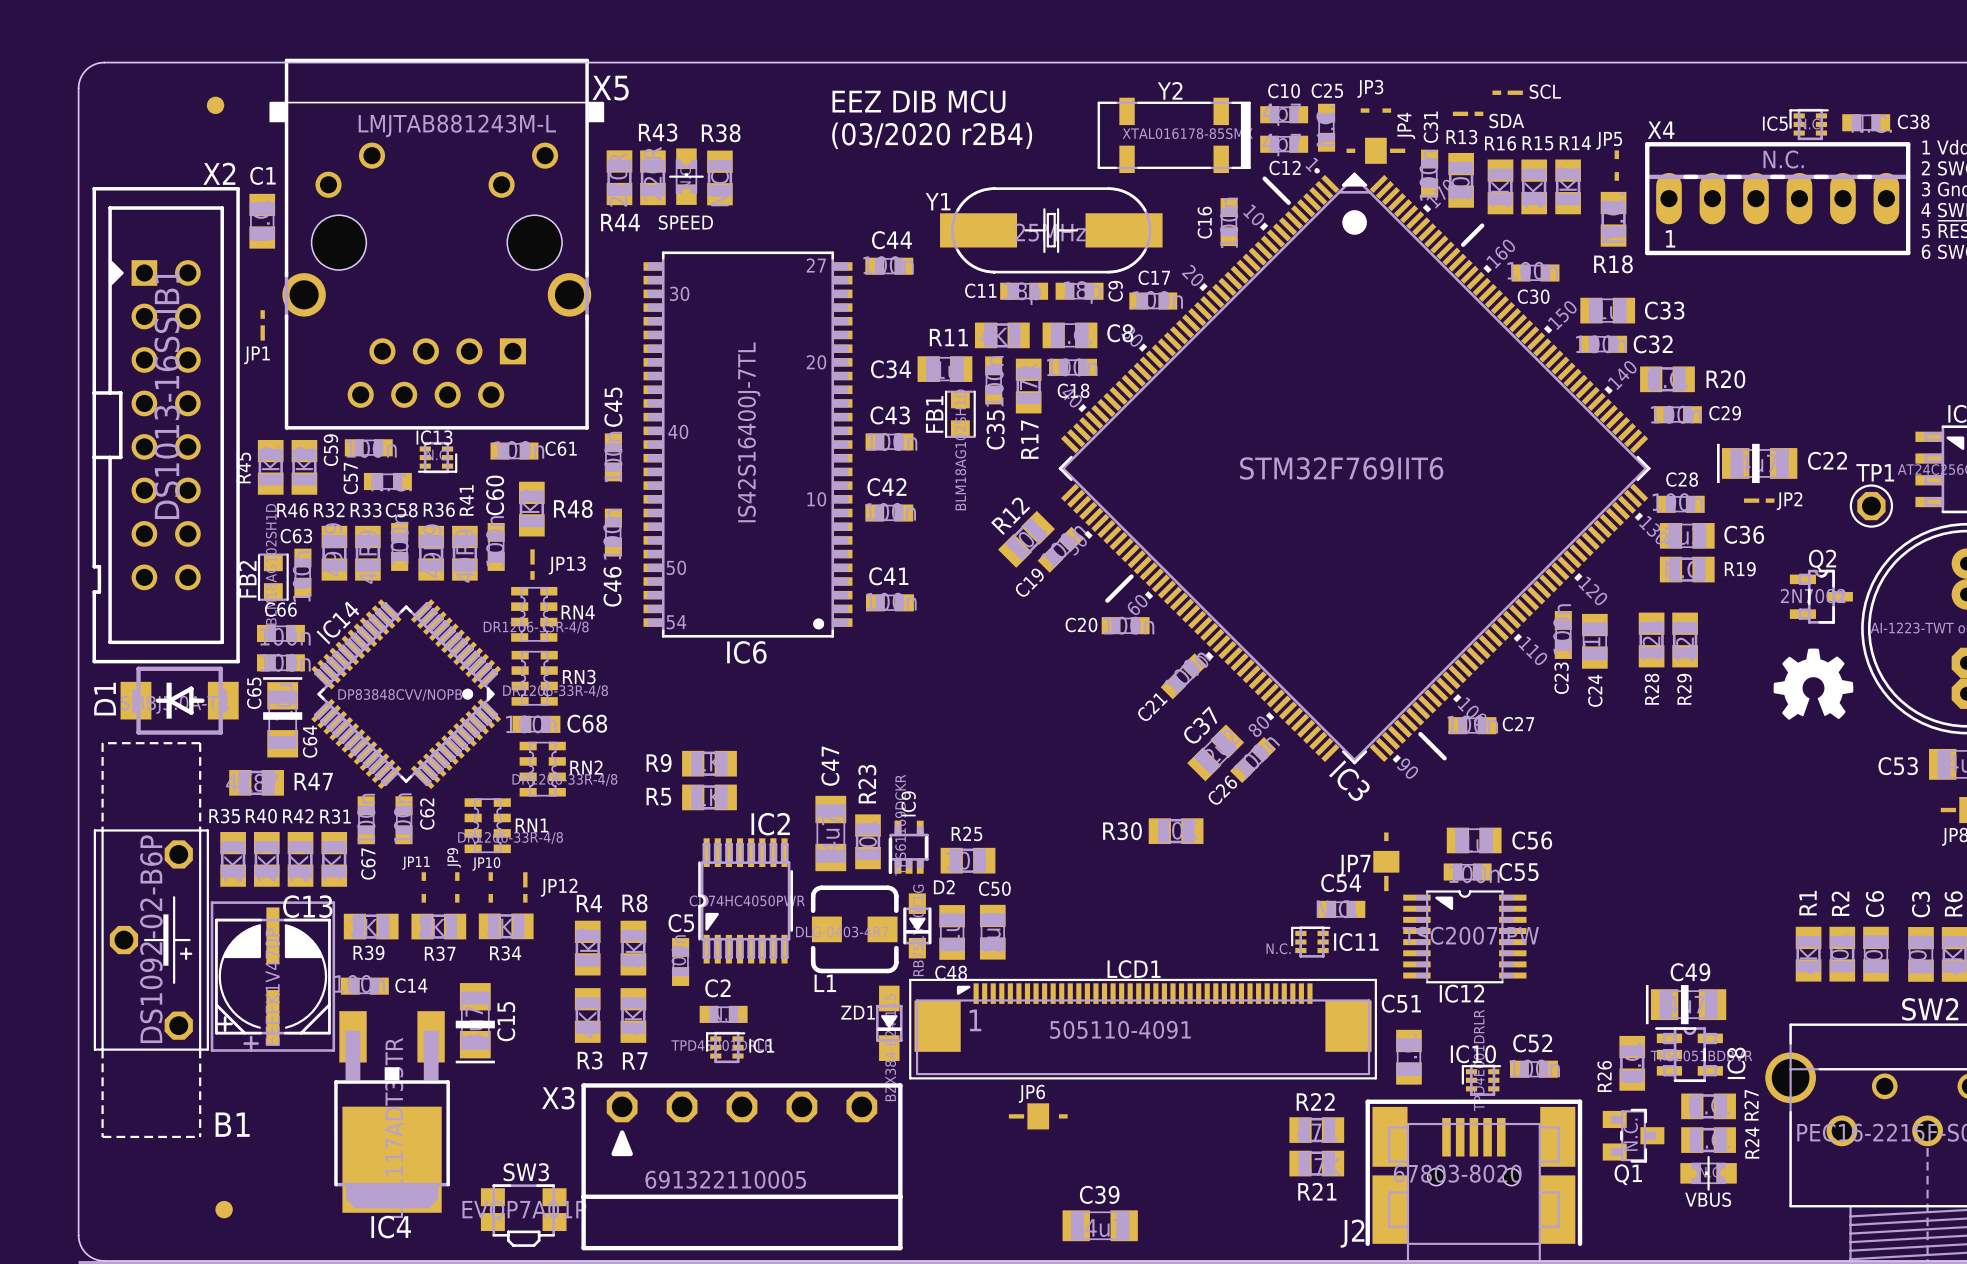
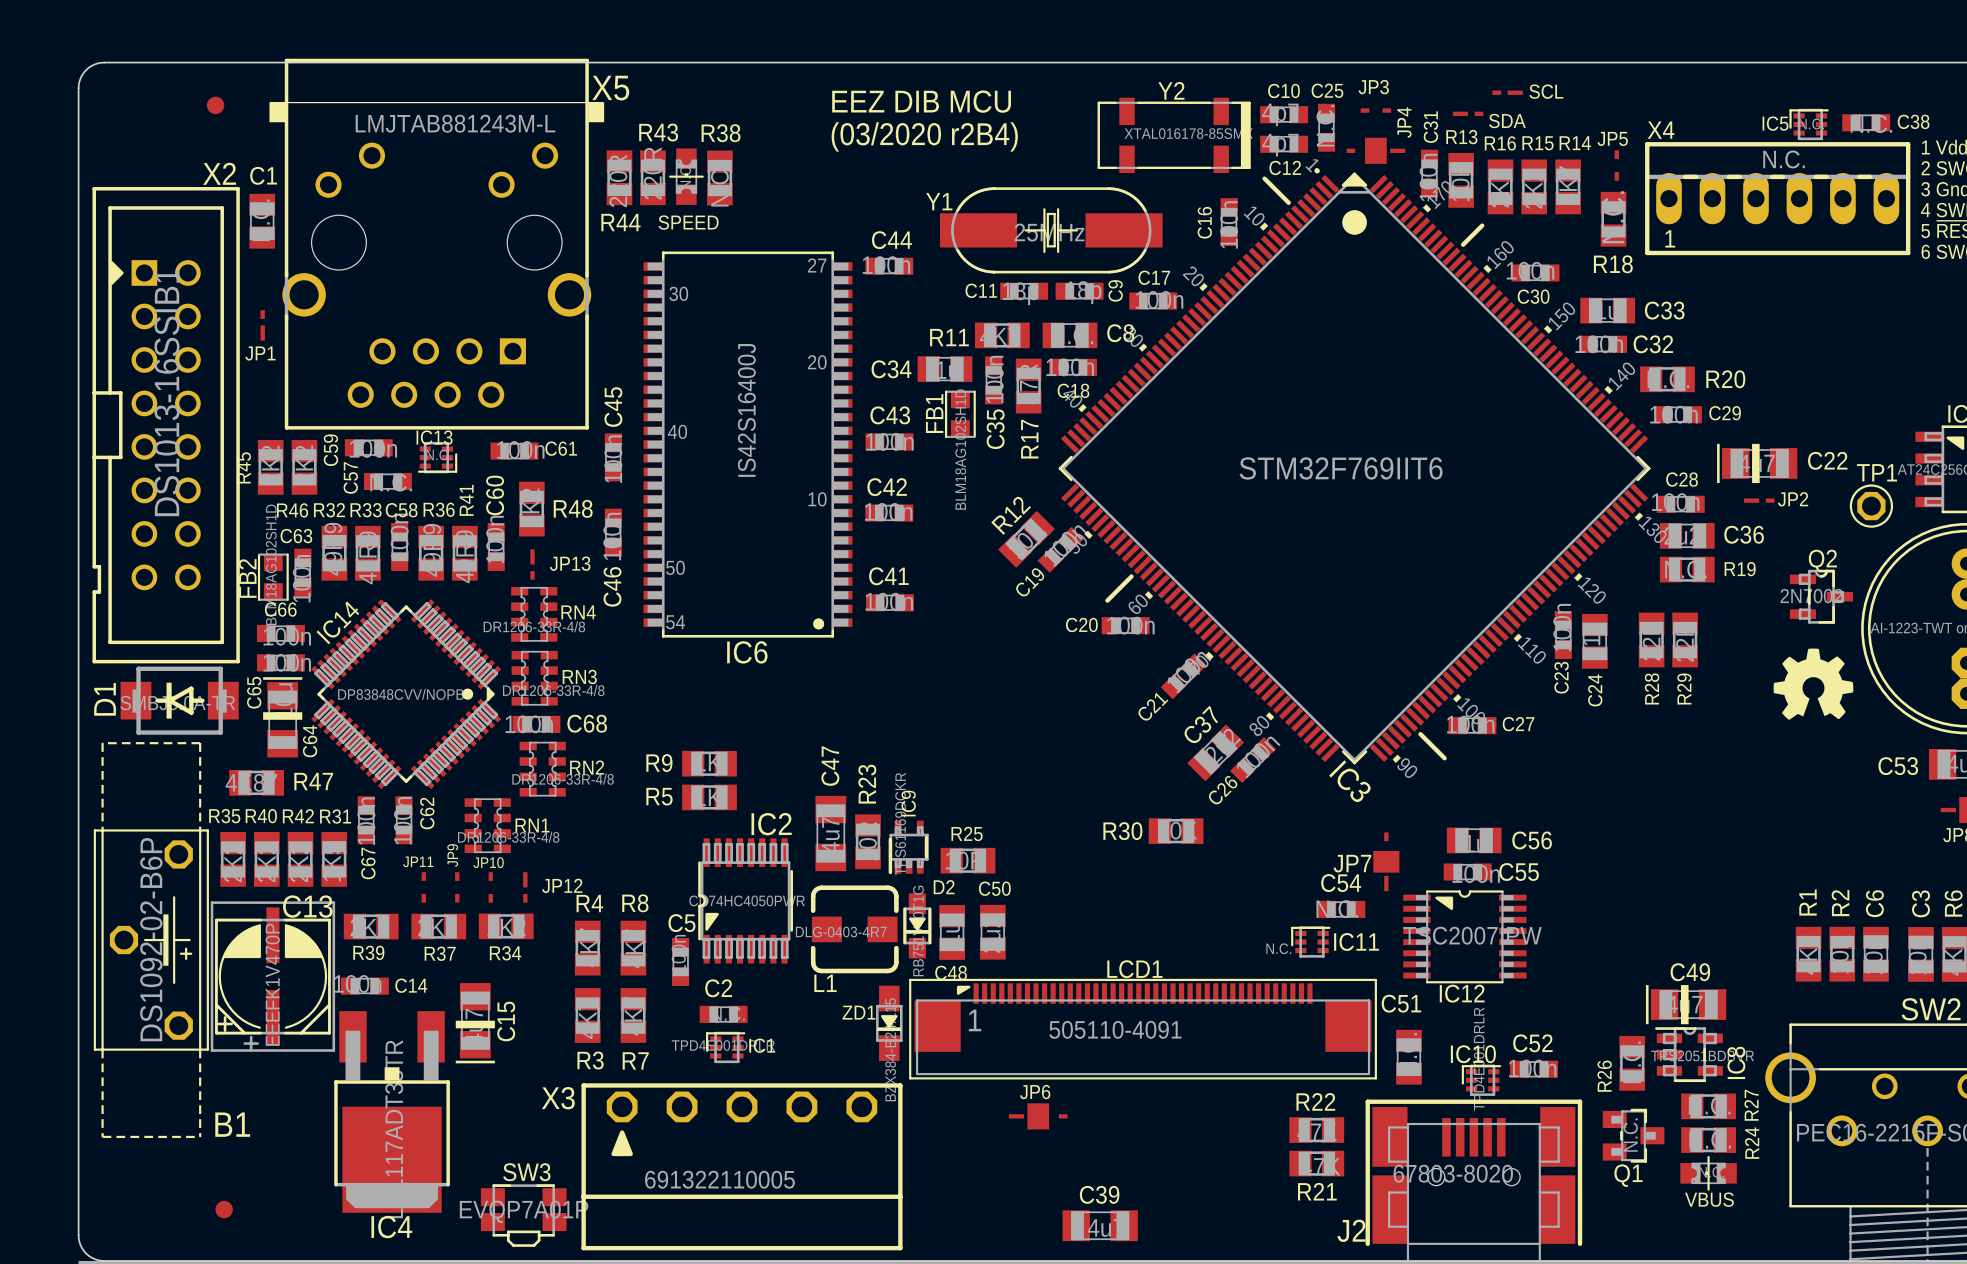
IC6 value: IS42S16400J-7TL (749, 432) -> IS42S16400J (746, 410)

